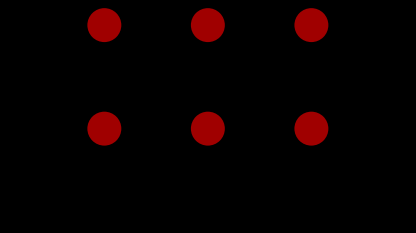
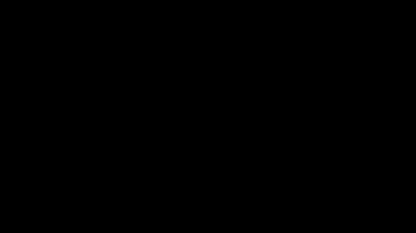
part: (104, 25) -> none
part: (207, 25) -> none
part: (311, 25) -> none
part: (104, 128) -> none
part: (207, 128) -> none
part: (311, 128) -> none

